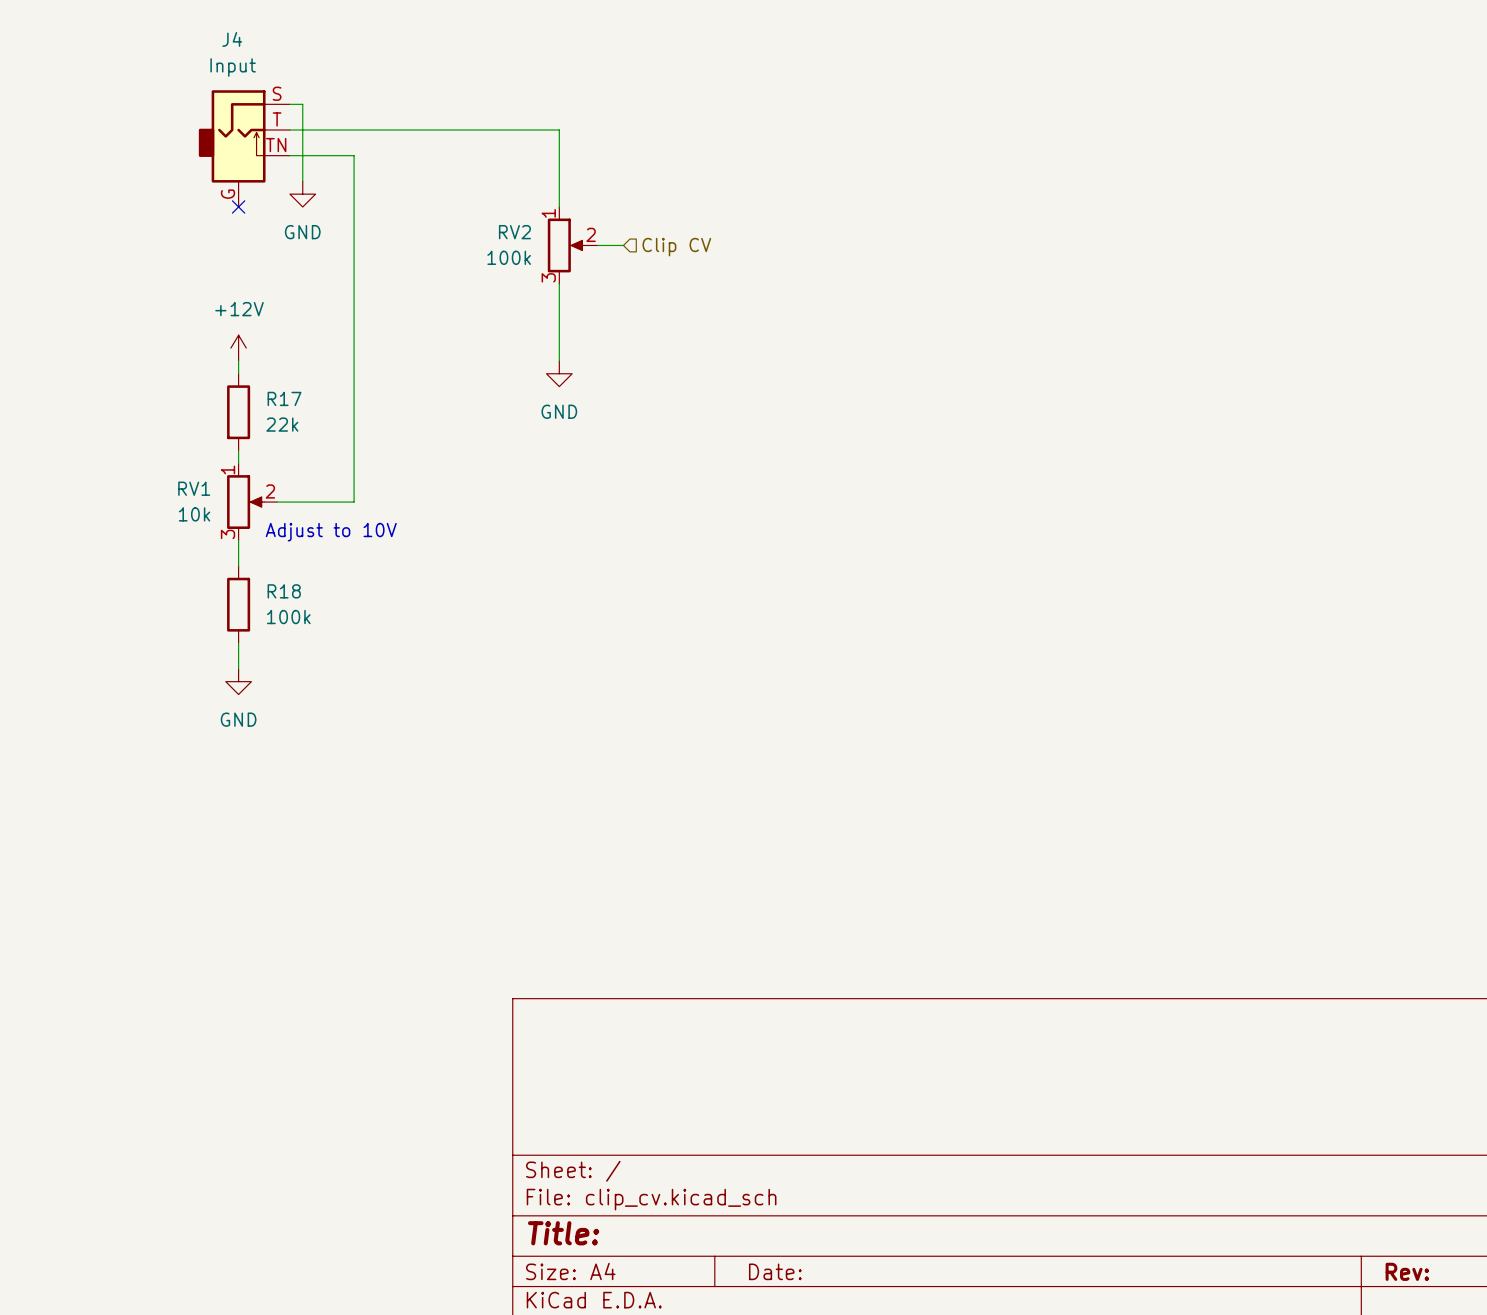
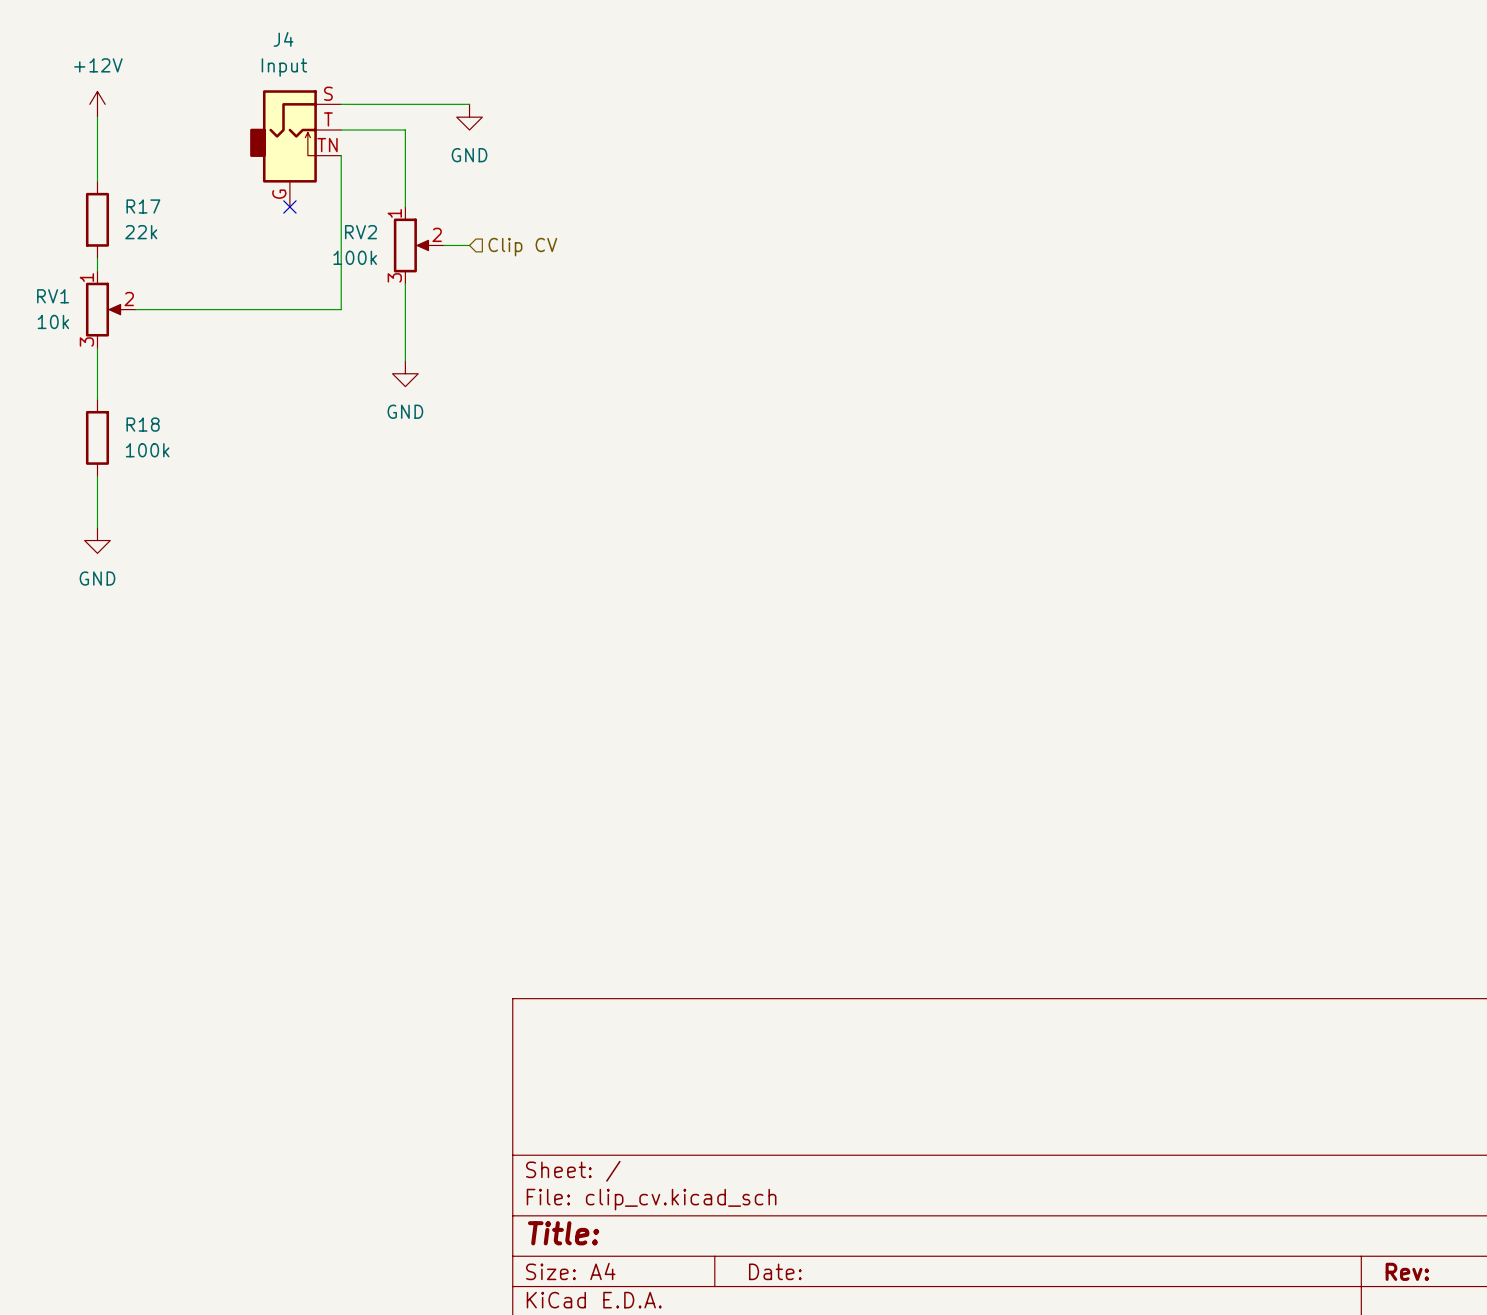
power symbol: none -> +12V (97, 104)
wire: none -> (341, 104) (469, 104)
wire: none -> (97, 117) (97, 181)
power symbol: none -> GND (469, 117)
wire: (405, 130) (559, 130) (559, 206) -> (405, 130) (405, 206)
J4 position: (244, 148) -> (295, 148)
wire: (289, 155) (354, 155) (354, 502) (277, 502) -> none
wire: none -> (341, 155) (341, 309) (135, 309)
power symbol: GND (302, 194) -> none
no-connect mark position: (238, 206) -> (289, 206)
RV2 position: (572, 245) -> (418, 245)
wire: (597, 245) (623, 245) -> (443, 245) (469, 245)
hierarchical label position: Clip CV (676, 247) -> Clip CV (522, 247)
wire: (559, 283) (559, 360) -> (405, 283) (405, 360)
wire: none -> (97, 348) (97, 399)
power symbol: +12V (238, 348) -> none
wire: (238, 360) (238, 373) -> (97, 258) (97, 271)
power symbol: none -> GND (405, 373)
power symbol: GND (559, 373) -> none
R17 position: (238, 412) -> (97, 219)
wire: (238, 450) (238, 463) -> none
wire: none -> (97, 476) (97, 527)
RV1 position: (252, 502) -> (110, 309)
text: Adjust to 10V (331, 532) -> none
power symbol: none -> GND (97, 540)
wire: (238, 540) (238, 566) -> none
R18 position: (238, 604) -> (97, 437)
wire: (238, 643) (238, 668) -> none
power symbol: GND (238, 681) -> none

